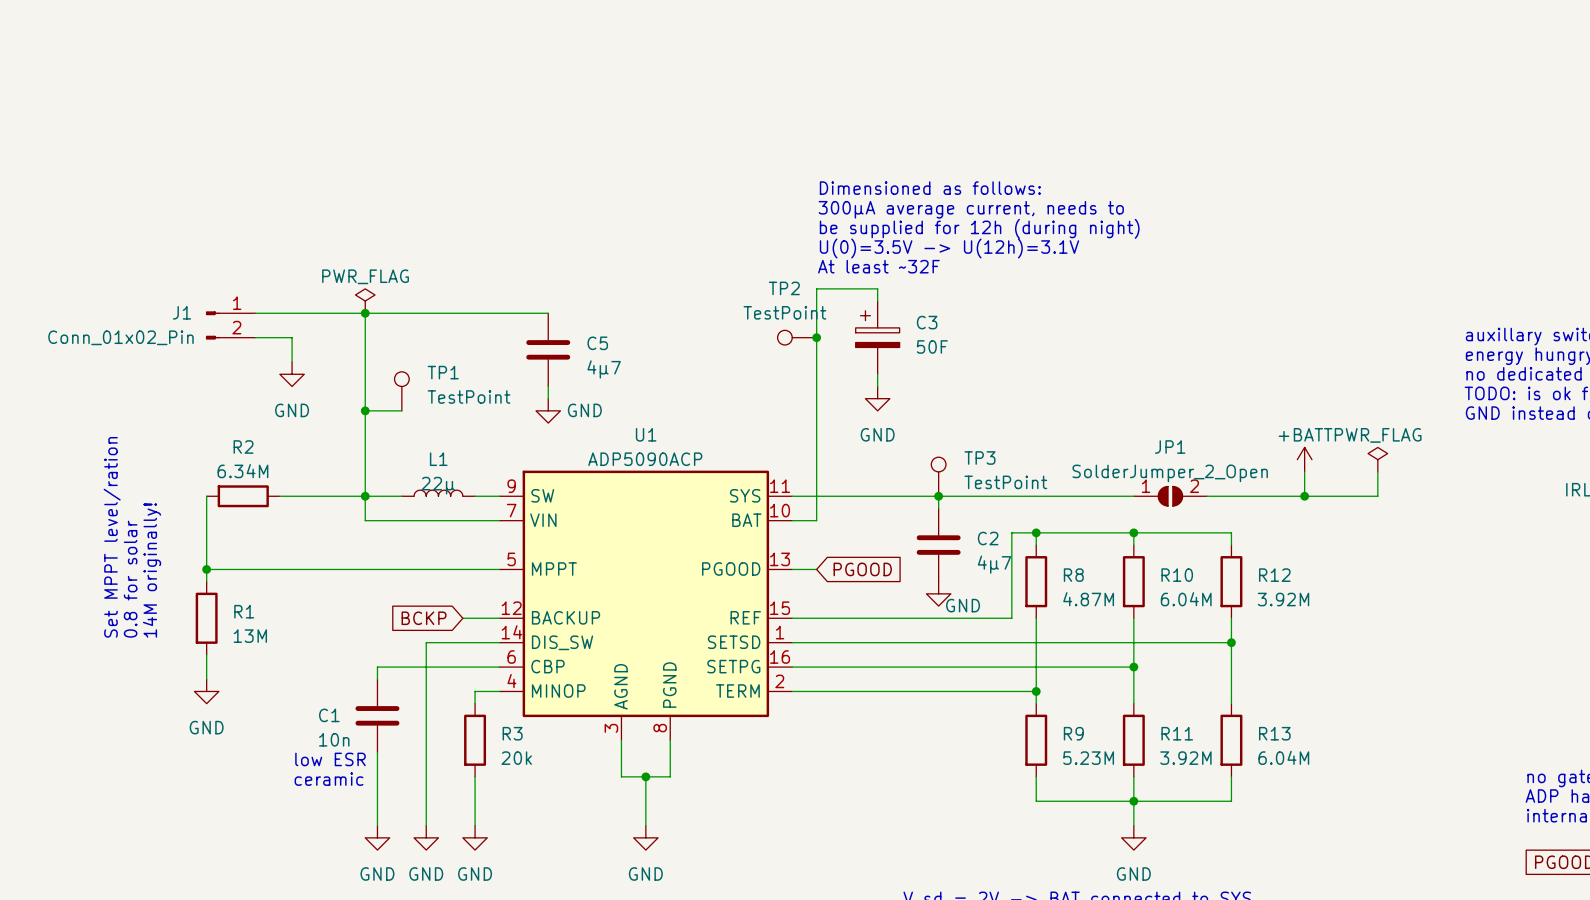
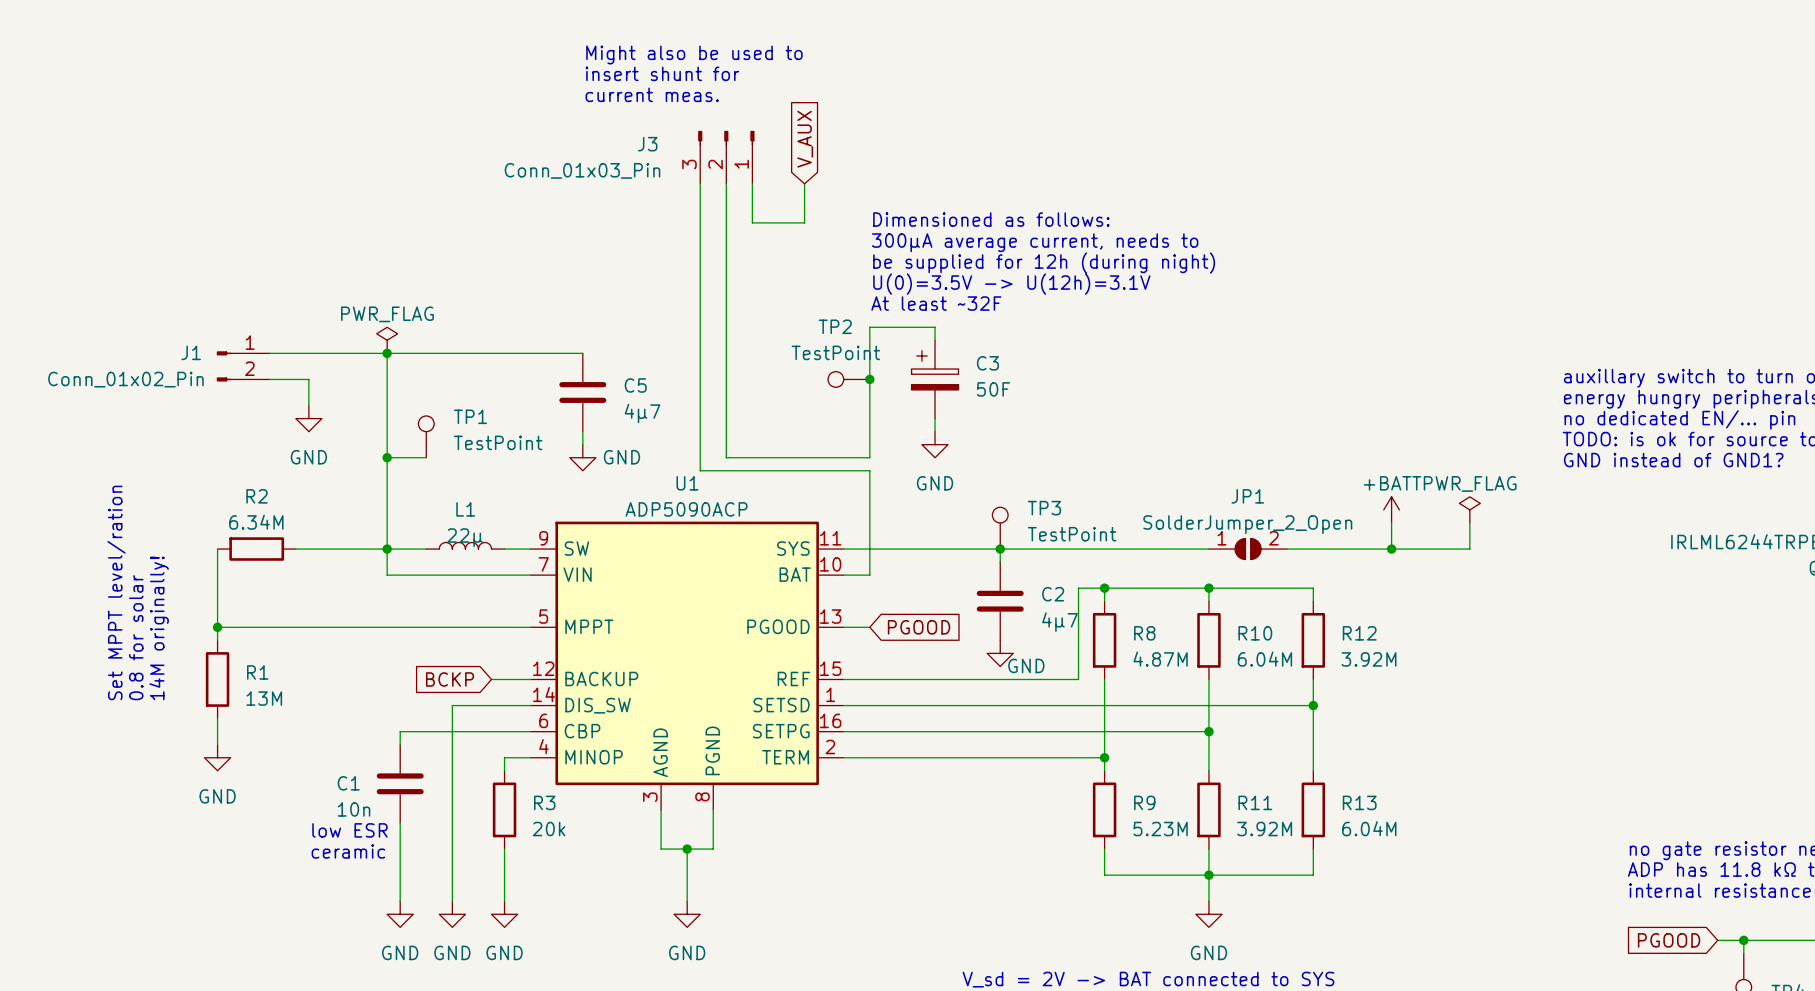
text: none -> Might also be used to (694, 55)
text: none -> insert shunt for (662, 73)
text: none -> current meas. (652, 94)
global label: none -> V_AUX (805, 139)
J3: none -> Conn_01x03_Pin (726, 157)
wire: none -> (700, 183) (700, 470) (869, 470)
wire: none -> (752, 183) (752, 222) (804, 222) (804, 183)
wire: (816, 410) (816, 423) -> (869, 457) (726, 457) (726, 183)

